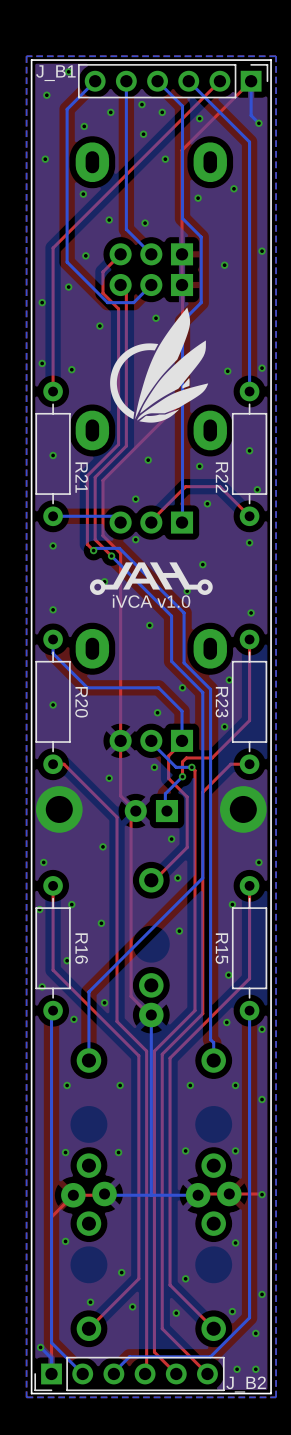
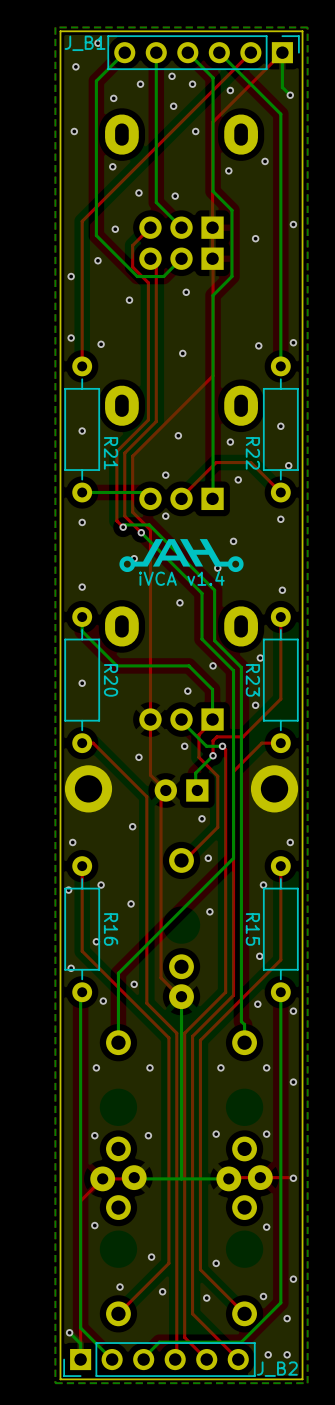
drawing: [110, 307, 209, 423] -> none
text: iVCA v1.0 (151, 601) -> iVCA v1.4 (181, 578)

